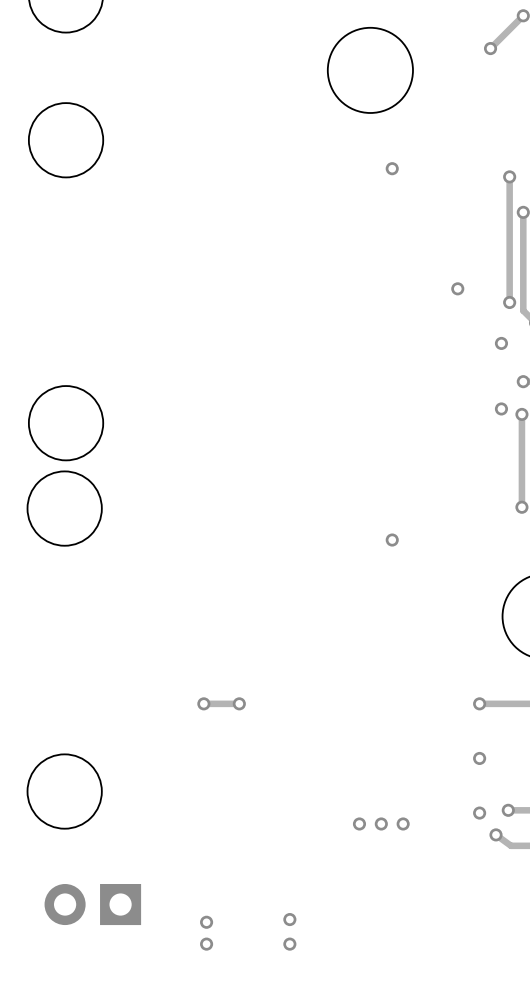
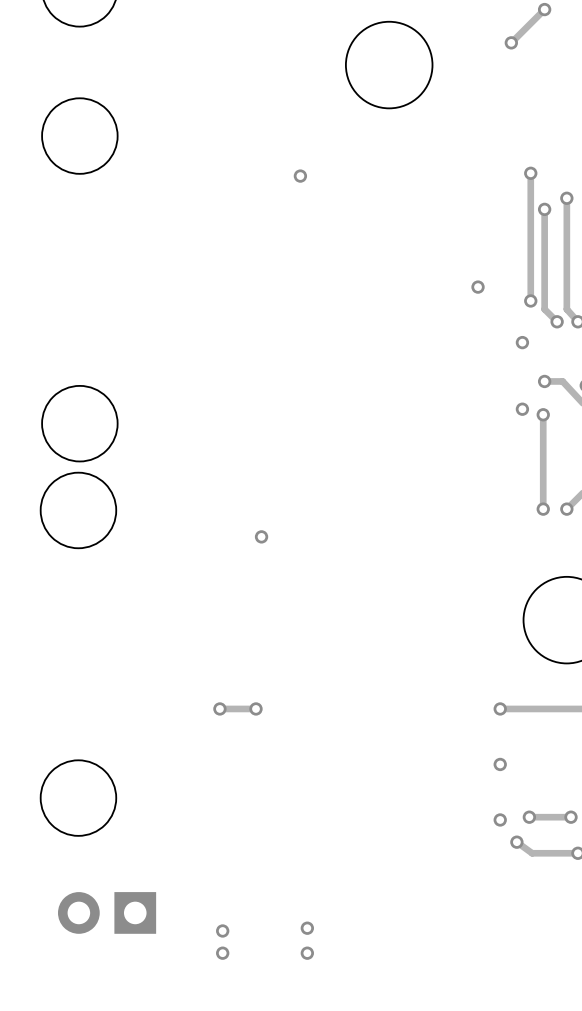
via position: (392, 168) -> (300, 176)
via: none -> (261, 536)
via: (392, 540) -> none
via: (359, 823) -> none
via: (381, 823) -> none
via: (403, 823) -> none

